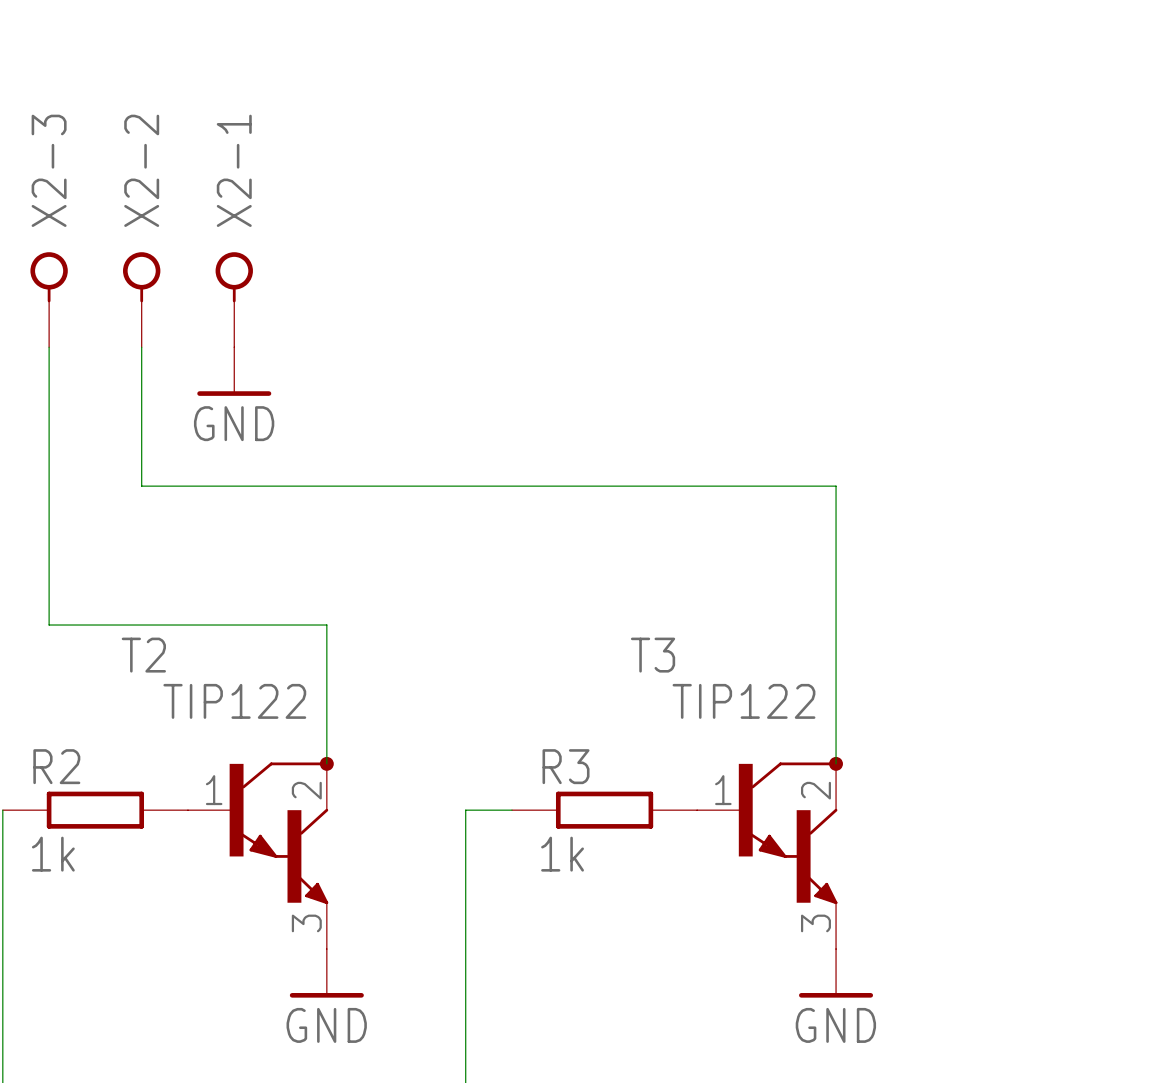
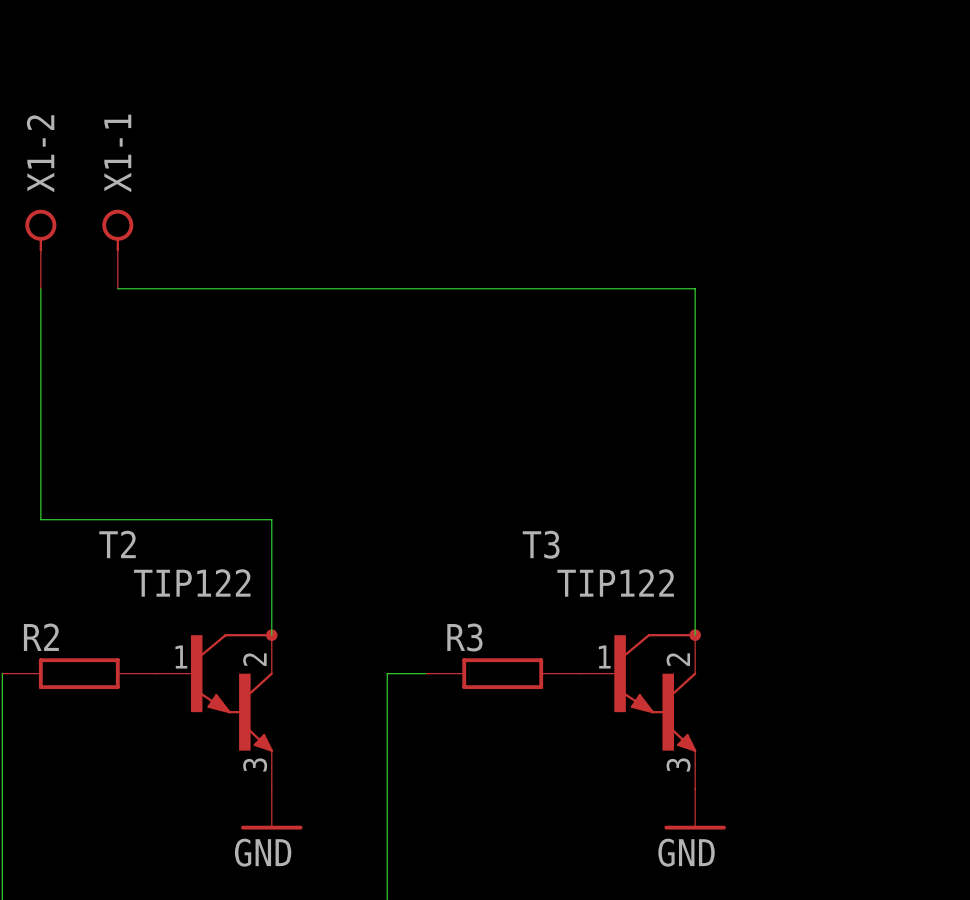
X2-3 name: X2-3 (49, 170) -> X1-2 (40, 153)
X2-2 name: X2-2 (141, 170) -> X1-1 (117, 153)
X2-1: (234, 299) -> none
wire: (141, 347) (141, 486) (836, 486) -> (117, 288) (695, 288) (695, 404)
power symbol: GND (234, 371) -> none
R2 value: 1k (53, 854) -> none
R3 value: 1k (562, 854) -> none

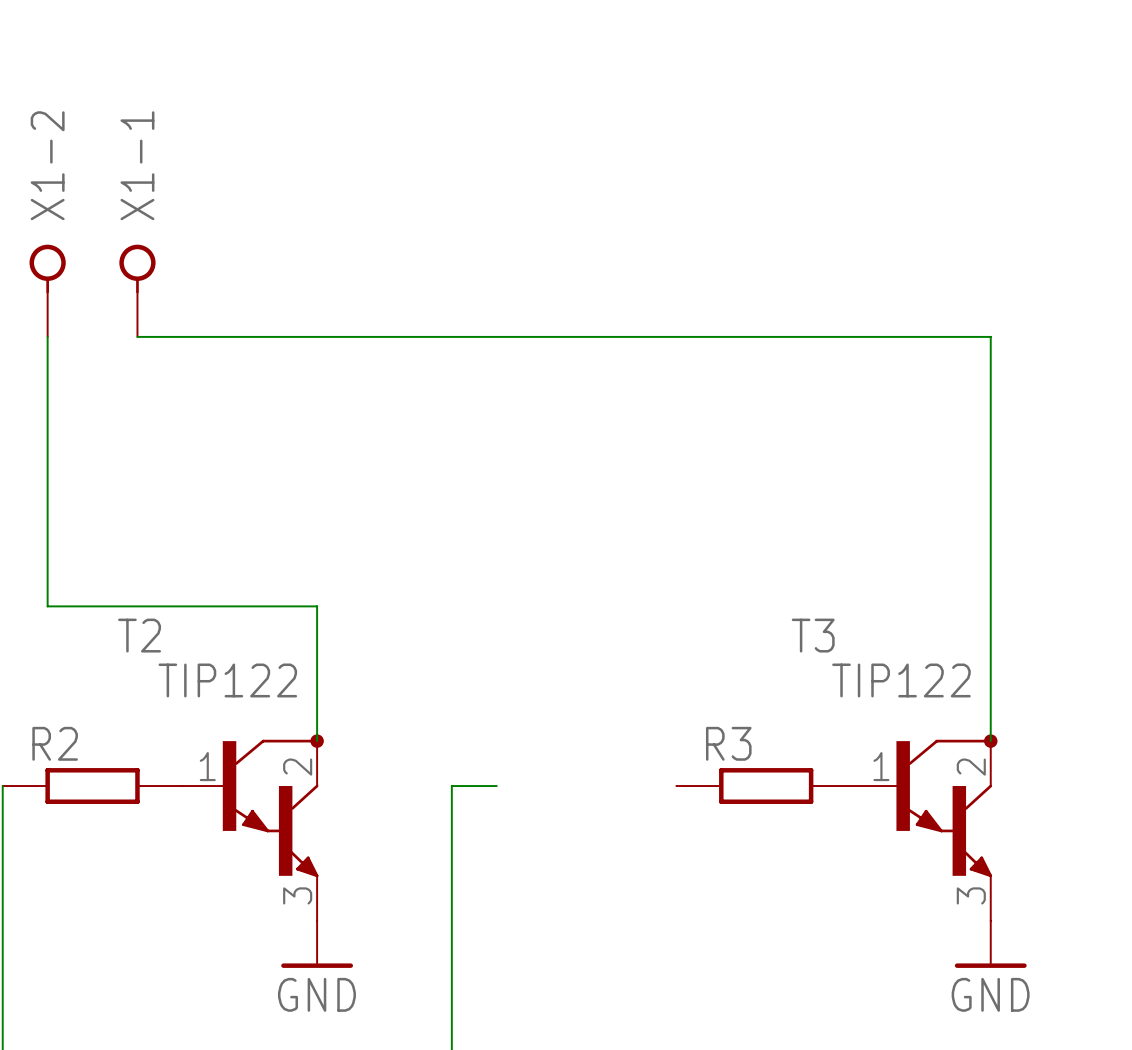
wire: (695, 288) (695, 635) -> (811, 336) (990, 336) (990, 741)
R3 position: (502, 673) -> (766, 786)
T3 position: (640, 709) -> (926, 827)
power symbol position: GND (695, 809) -> GND (990, 944)

